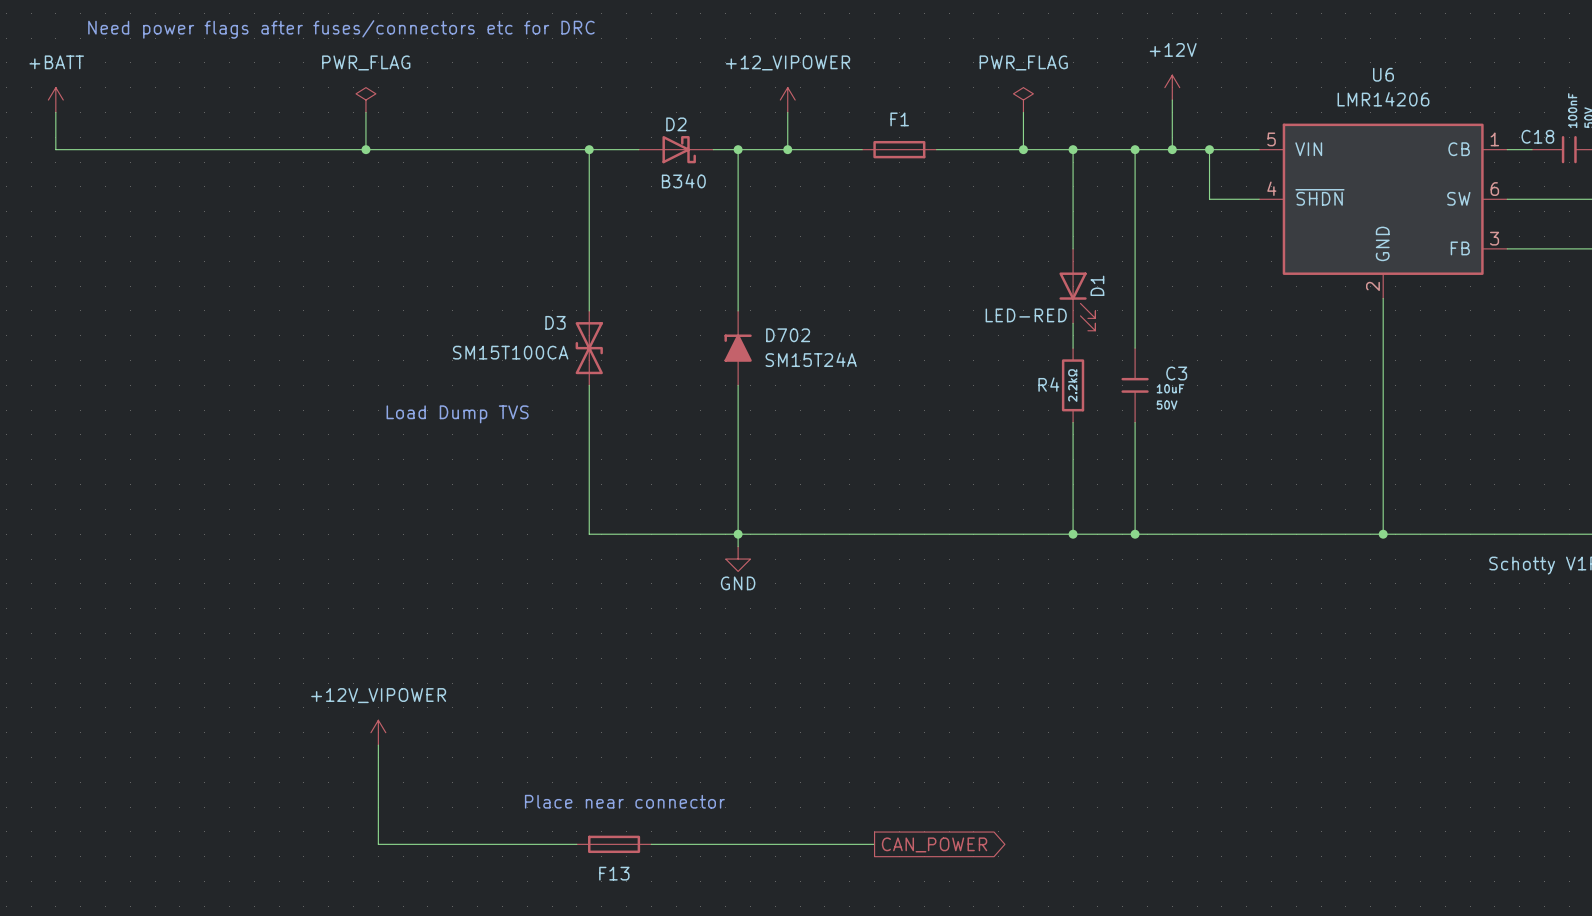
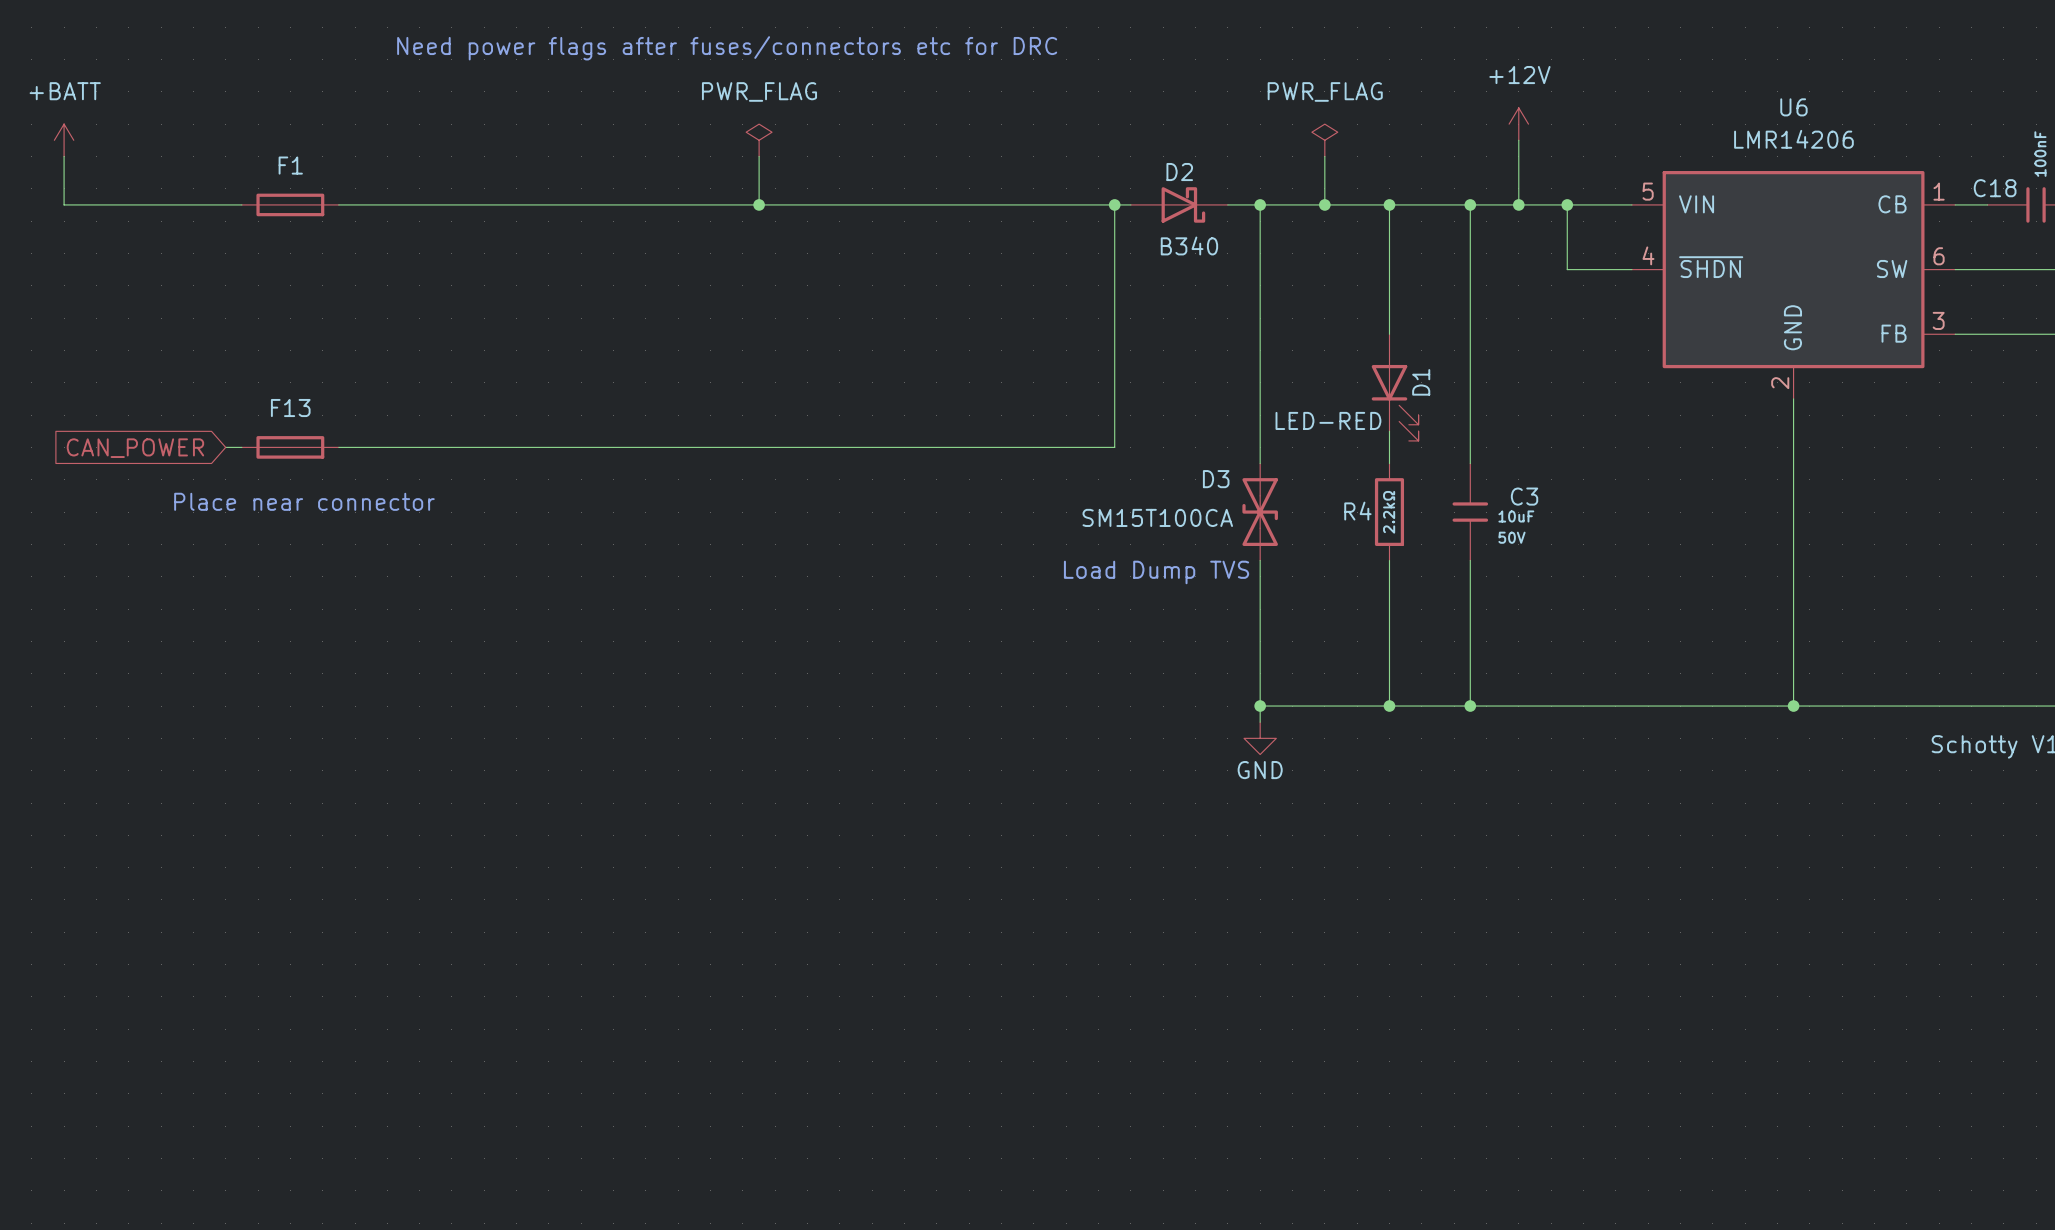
text position: Need power flags after fuses/connectors etc for DRC (341, 29) -> Need power flags after fuses/connectors etc for DRC (727, 48)
power symbol position: PWR_FLAG (365, 100) -> PWR_FLAG (759, 140)
power symbol: +12_VIPOWER (787, 100) -> none
wire: (365, 112) (365, 149) -> none
wire: (787, 112) (787, 149) -> none
junction: (365, 149) -> none
wire: (589, 149) (589, 310) -> (759, 204) (759, 156)
D2 position: (676, 149) -> (1179, 204)
wire: (738, 149) (738, 310) -> none
junction: (738, 149) -> none
junction: (787, 149) -> none
junction: none -> (1114, 204)
wire: none -> (1130, 204) (1114, 204) (1114, 447) (338, 447)
F1 position: (899, 149) -> (290, 204)
wire: none -> (1260, 204) (1260, 463)
junction: none -> (1260, 204)
wire: none -> (225, 447) (241, 447)
global label: none -> CAN_POWER (135, 448)
D3 position: (589, 348) -> (1260, 512)
D702: SM15T24A (738, 348) -> none
text: none -> Place near connector (304, 501)
wire: (589, 385) (589, 534) (973, 534) -> none
wire: (738, 385) (738, 546) -> none
text: Load Dump TVS (457, 414) -> none
wire: none -> (1260, 560) (1260, 722)
text: none -> Load Dump TVS (1156, 572)
junction: (738, 534) -> none
junction: none -> (1260, 706)
power symbol position: GND (738, 559) -> GND (1260, 738)
power symbol: +12V_VIPOWER (378, 732) -> none
wire: (378, 745) (378, 844) (576, 844) -> none
text: Place near connector (624, 801) -> none
F13 position: (614, 844) -> (290, 447)
wire: (651, 844) (874, 844) -> none
global label: CAN_POWER (934, 844) -> none
F13 name position: F13 (614, 873) -> F13 (290, 408)

